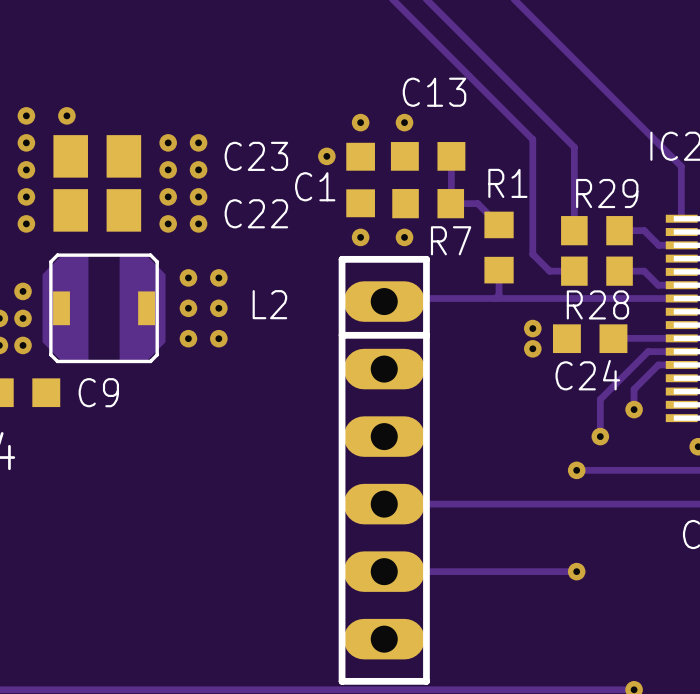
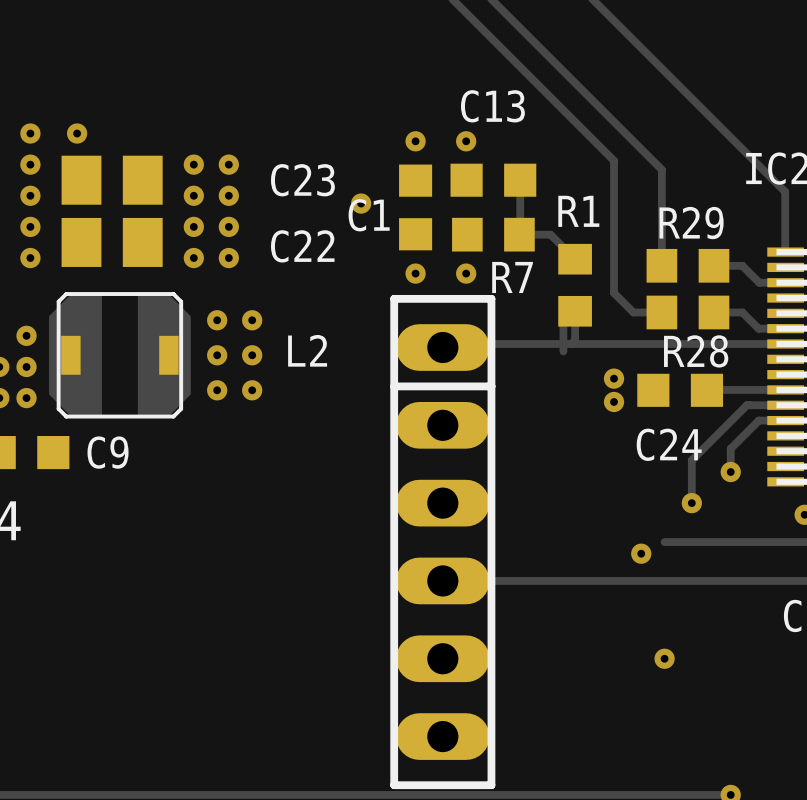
via position: (326, 156) -> (361, 203)
track: none -> (563, 315) (563, 351)
C24 name position: C24 (587, 375) -> C24 (669, 444)
via position: (576, 470) -> (641, 553)
track: (384, 571) (576, 571) -> none

